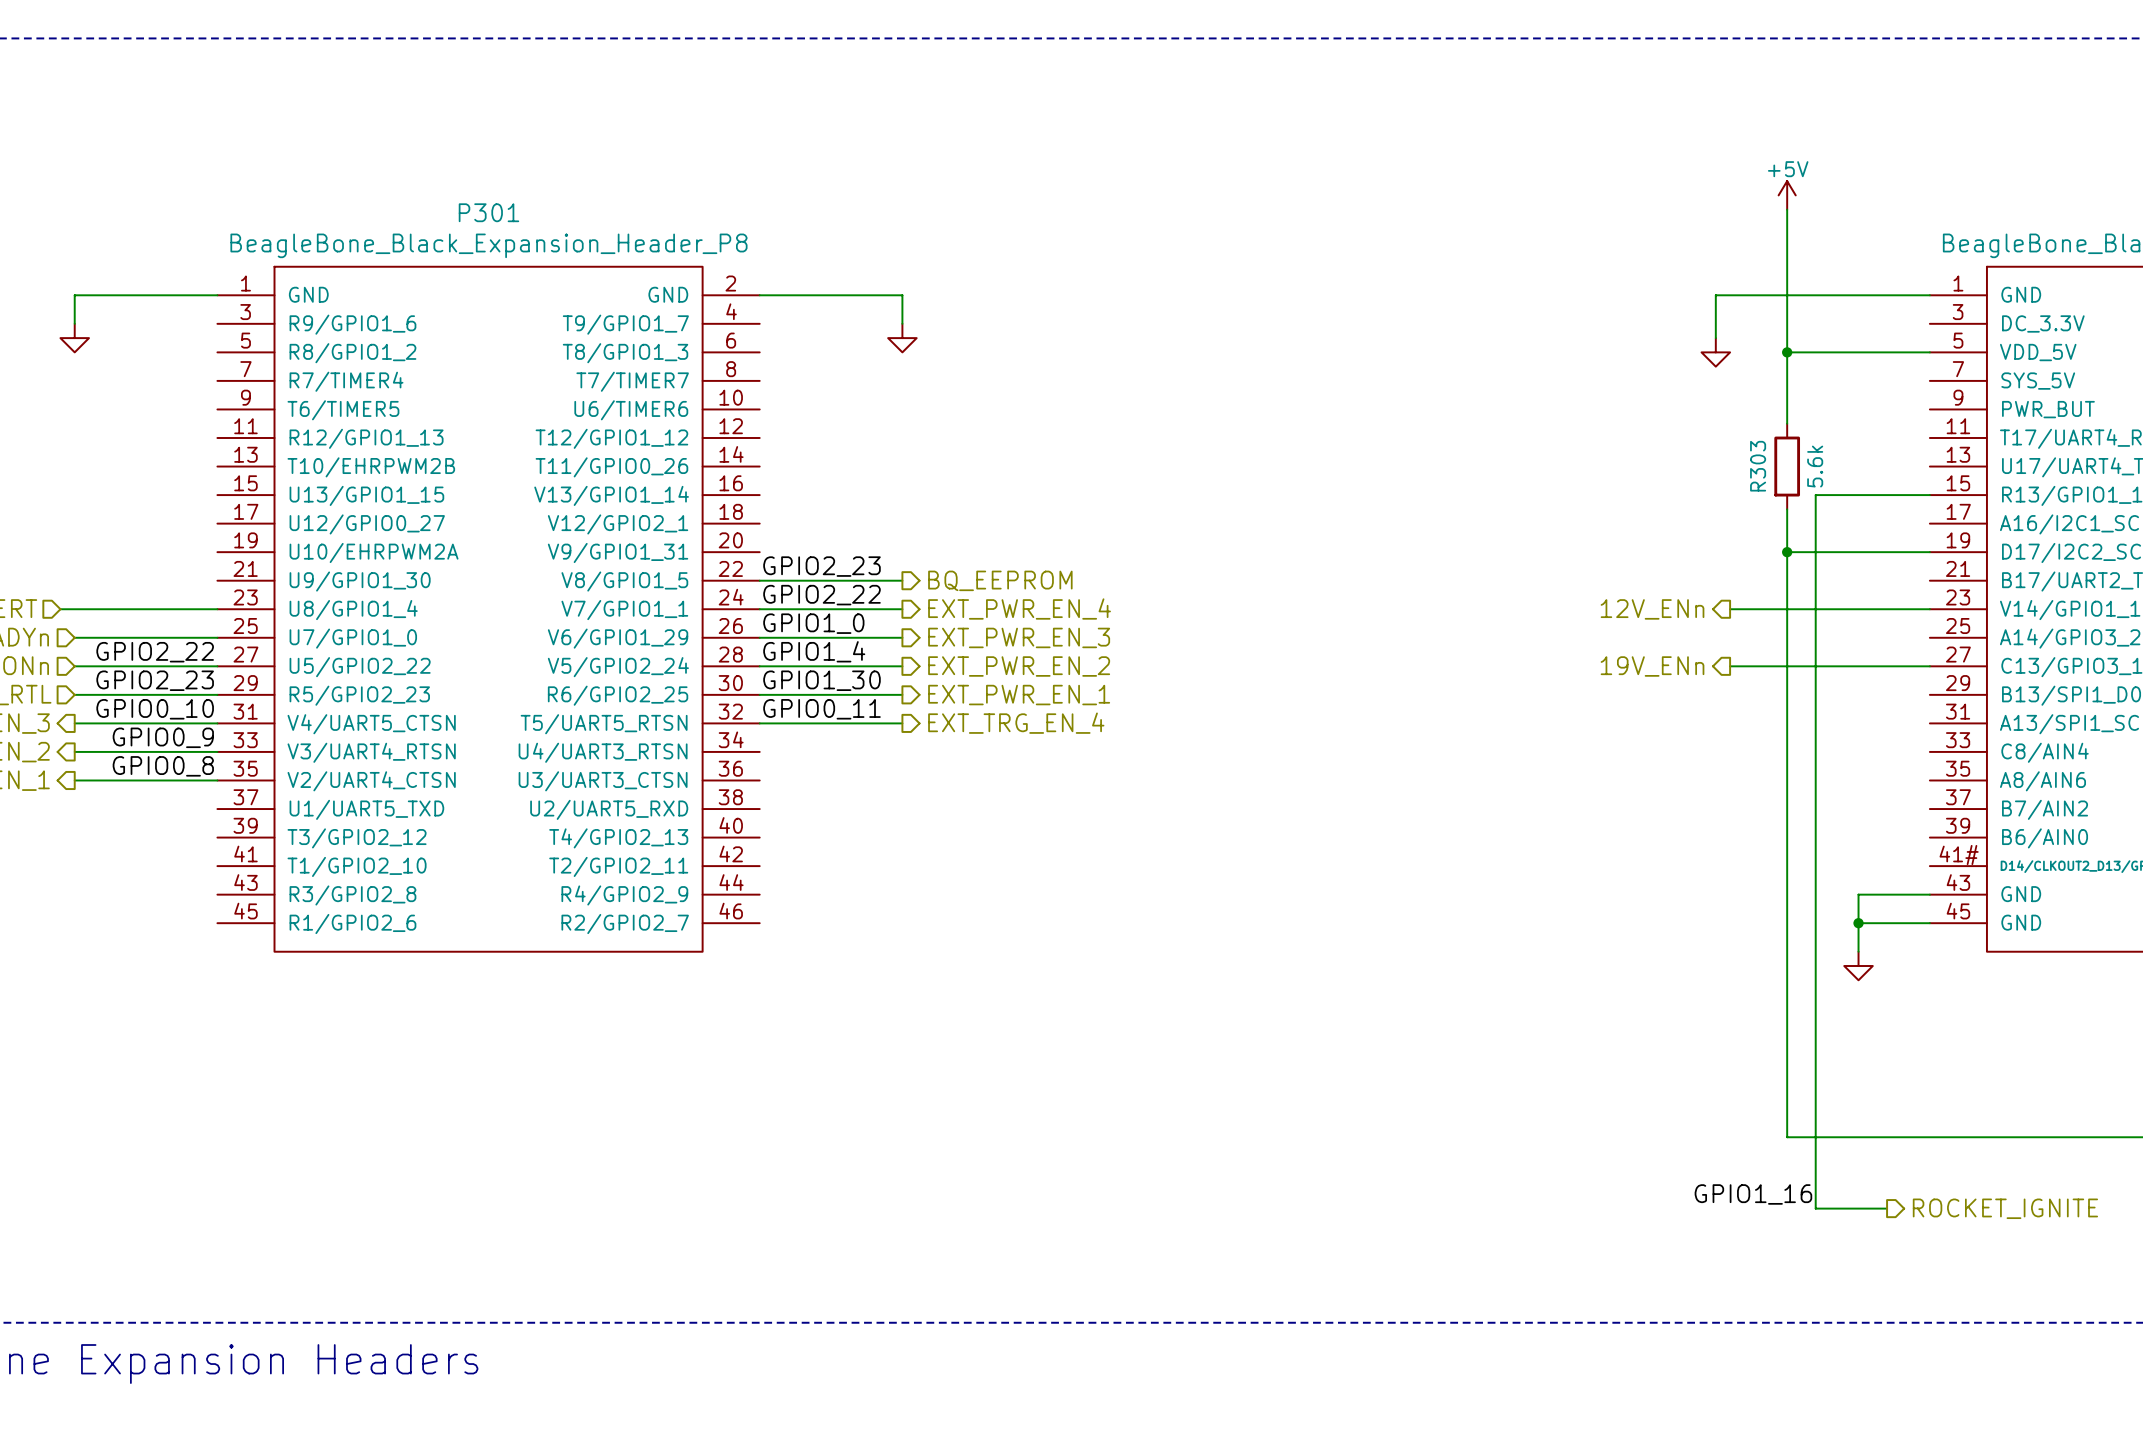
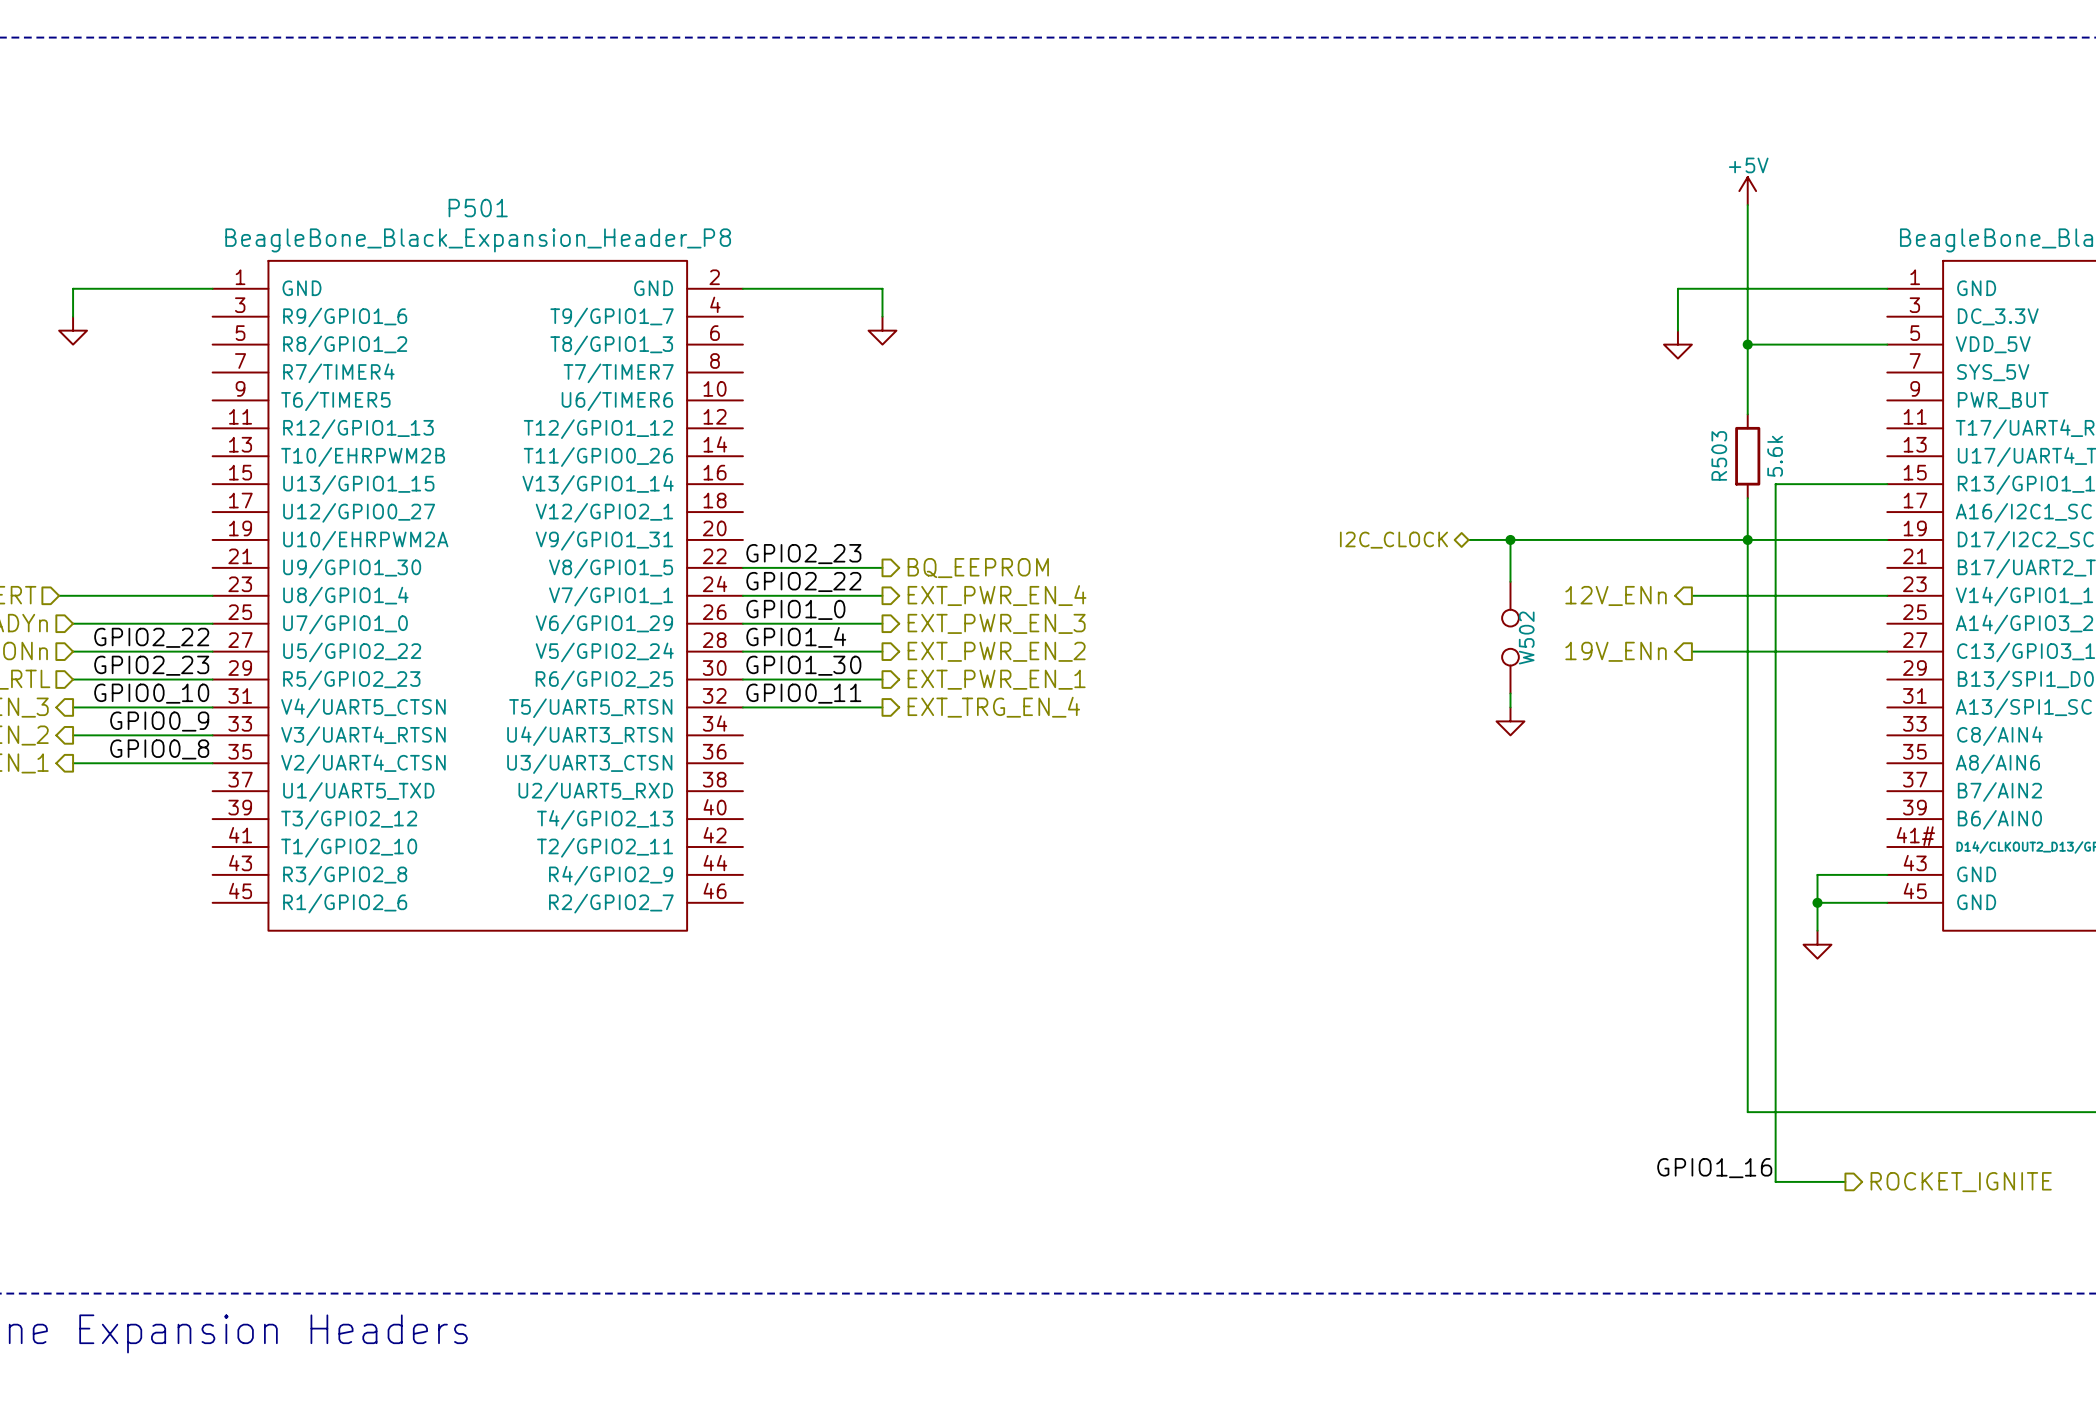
P301 name: P301 (488, 212) -> P501 (478, 208)
R303 name: R303 (1758, 466) -> R503 (1719, 455)
hierarchical label: none -> I2C_CLOCK (1393, 540)
wire: none -> (1468, 539) (1747, 539)
wire: none -> (1510, 539) (1510, 581)
junction: none -> (1510, 539)
W502: none -> (1510, 637)
wire: none -> (1510, 693) (1510, 707)
power symbol: none -> (1510, 721)

